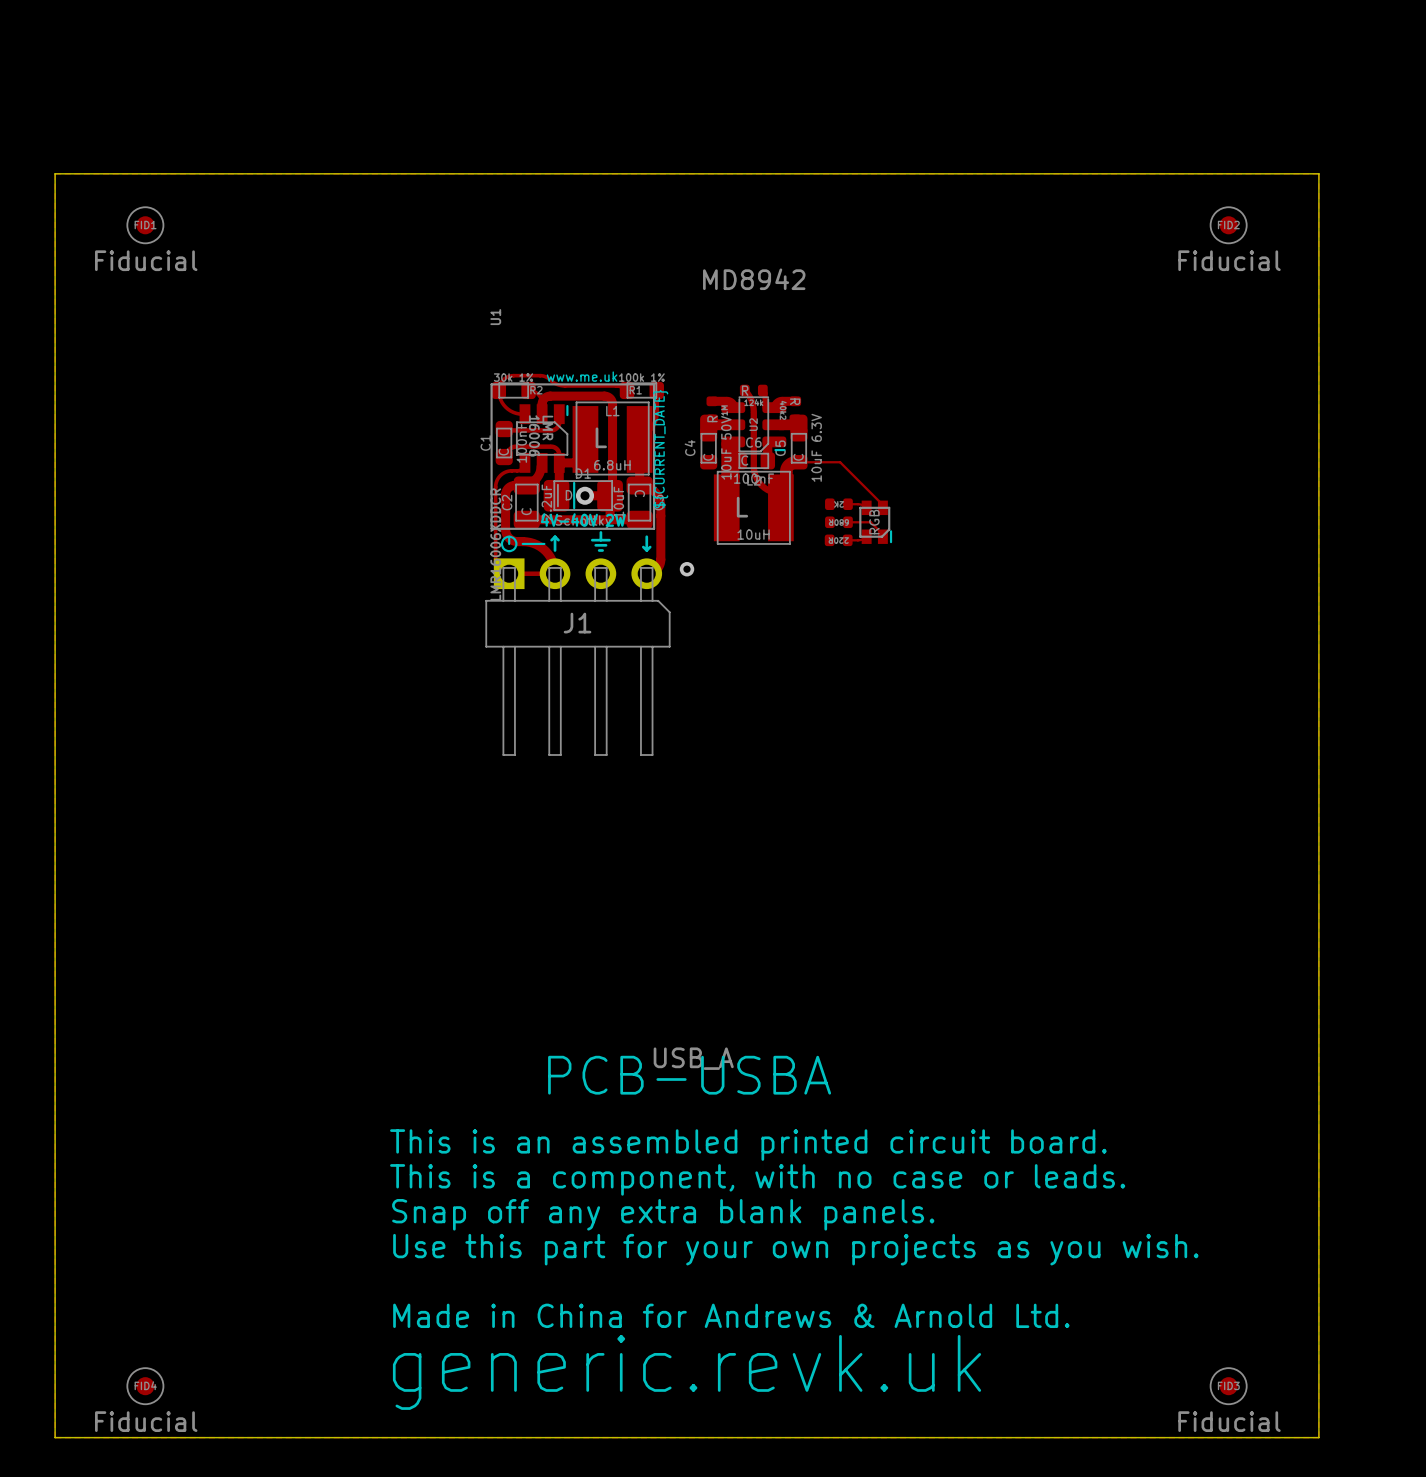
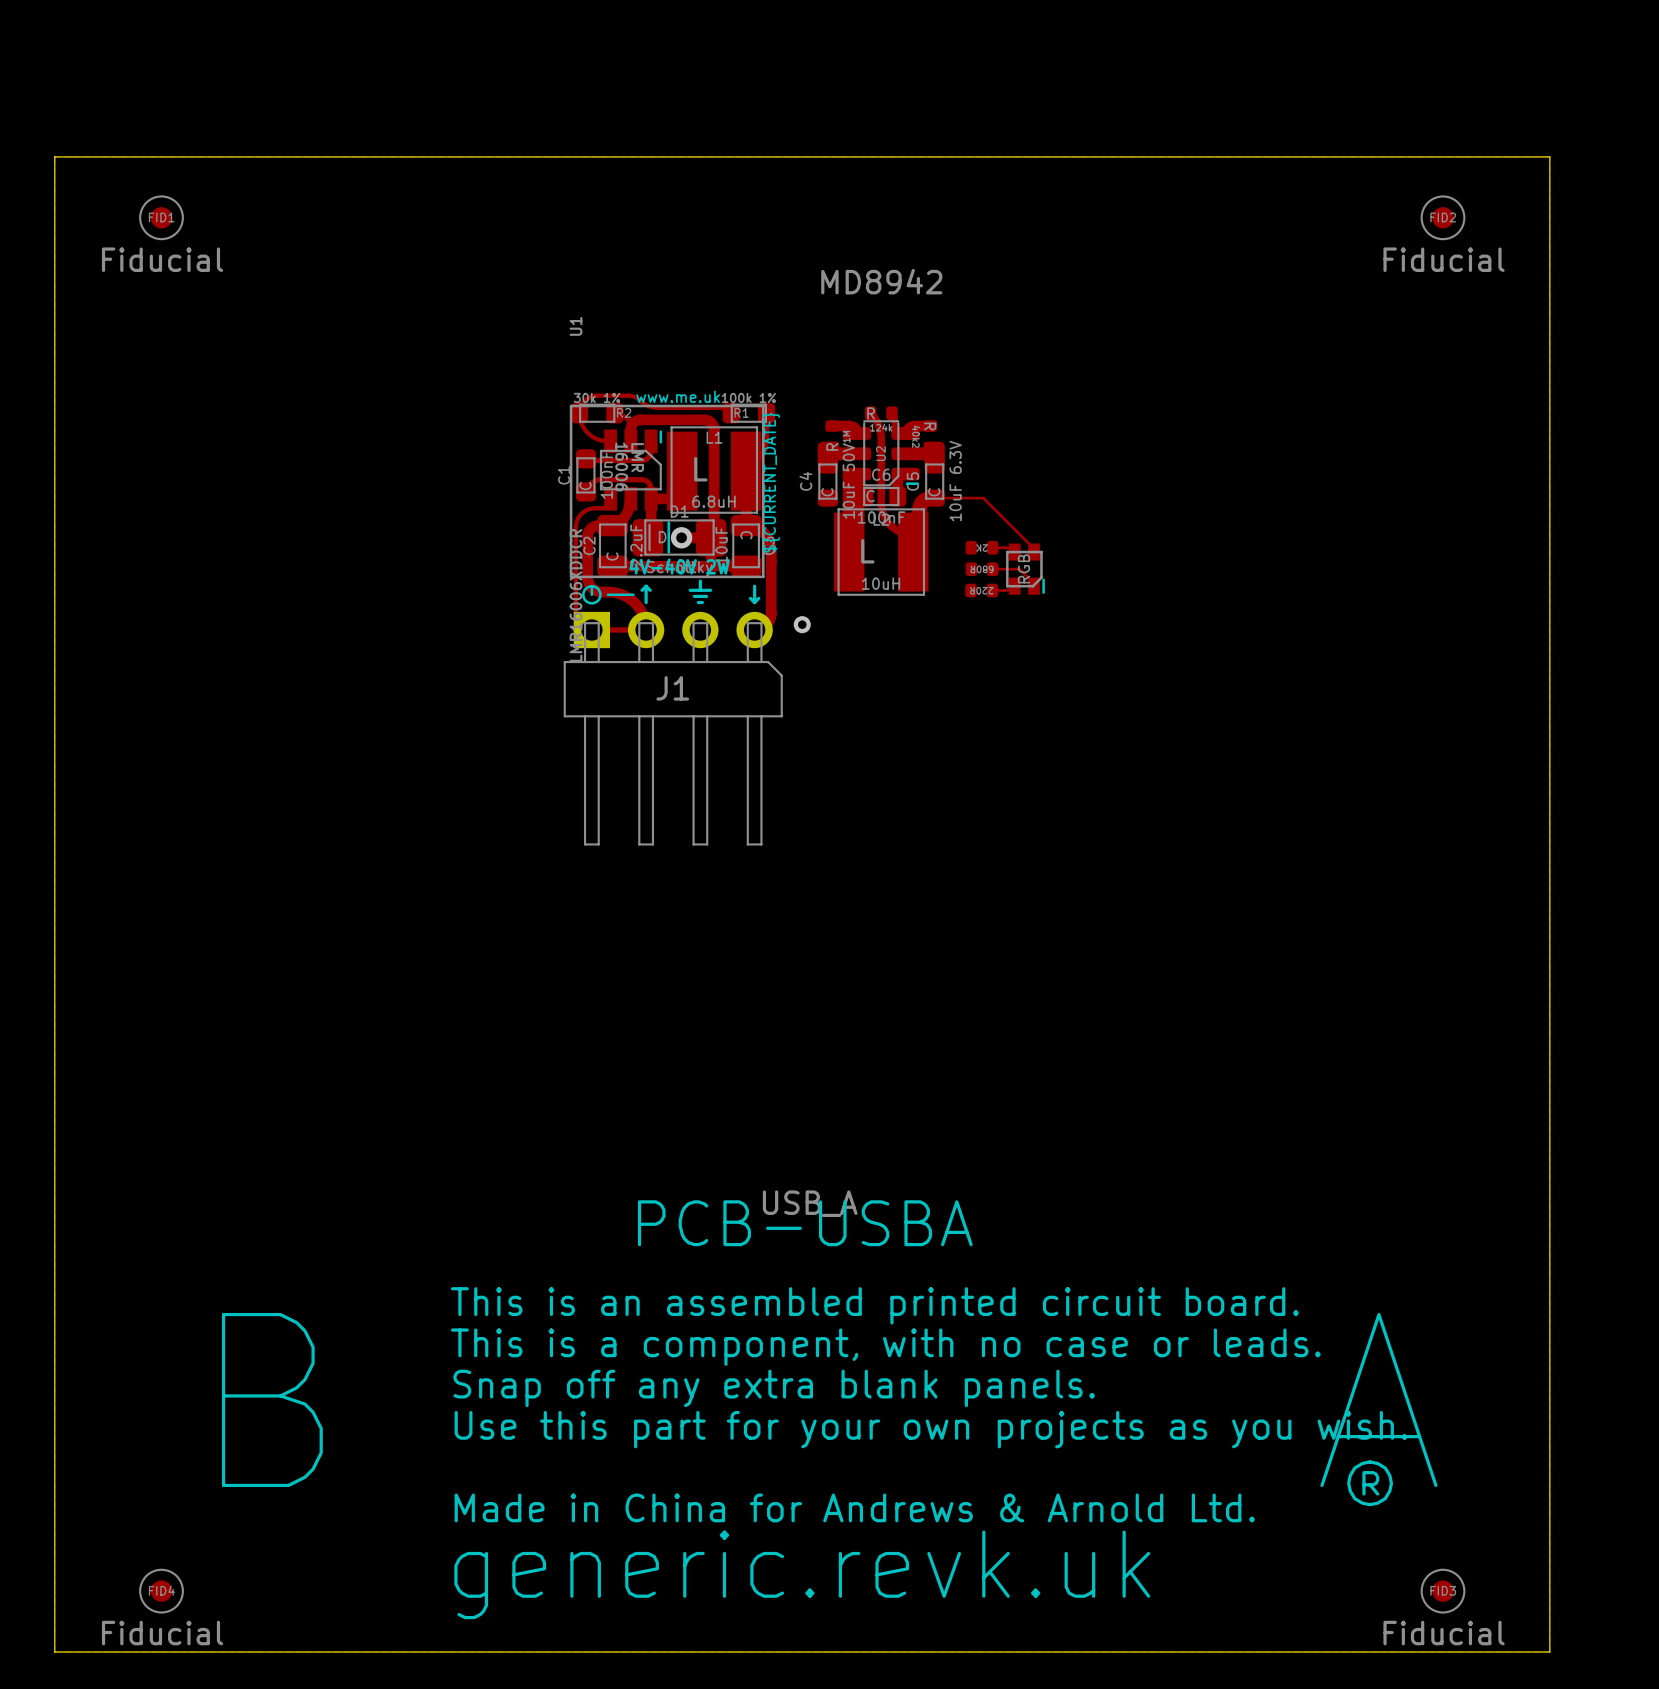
text: none -> B (272, 1400)
text: none -> A (1378, 1400)
text: none -> ® (1370, 1483)

